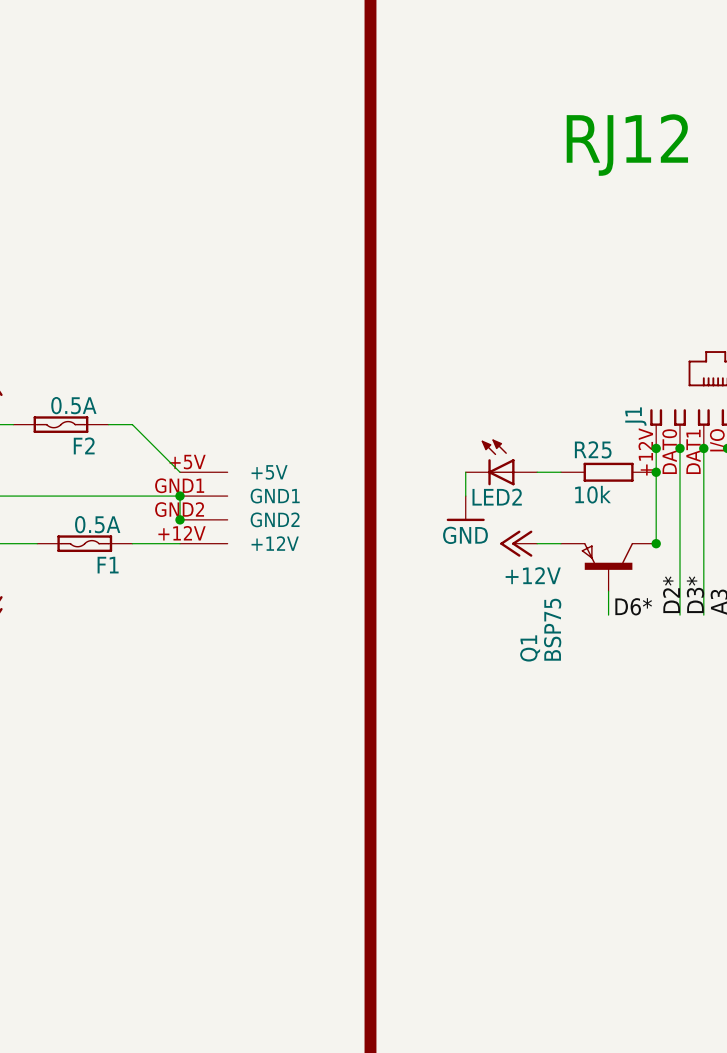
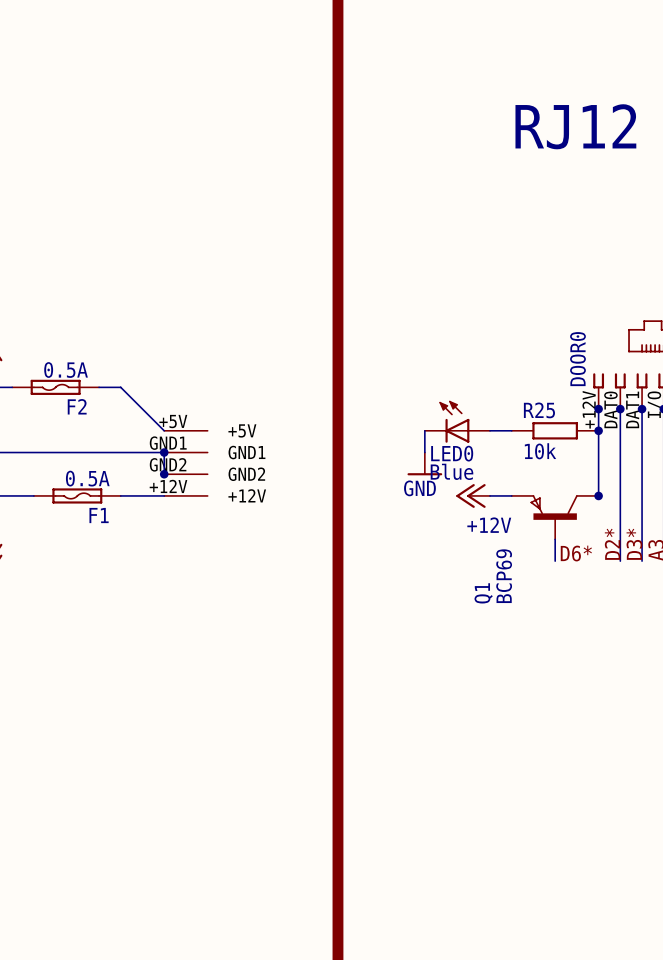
J1 name: J1 (635, 416) -> DOOR0 (577, 359)
LED2 name: LED2 (497, 497) -> LED0 (452, 453)
LED2 value: none -> Blue (452, 471)
Q1 value: BSP75 (552, 629) -> BCP69 (504, 576)

